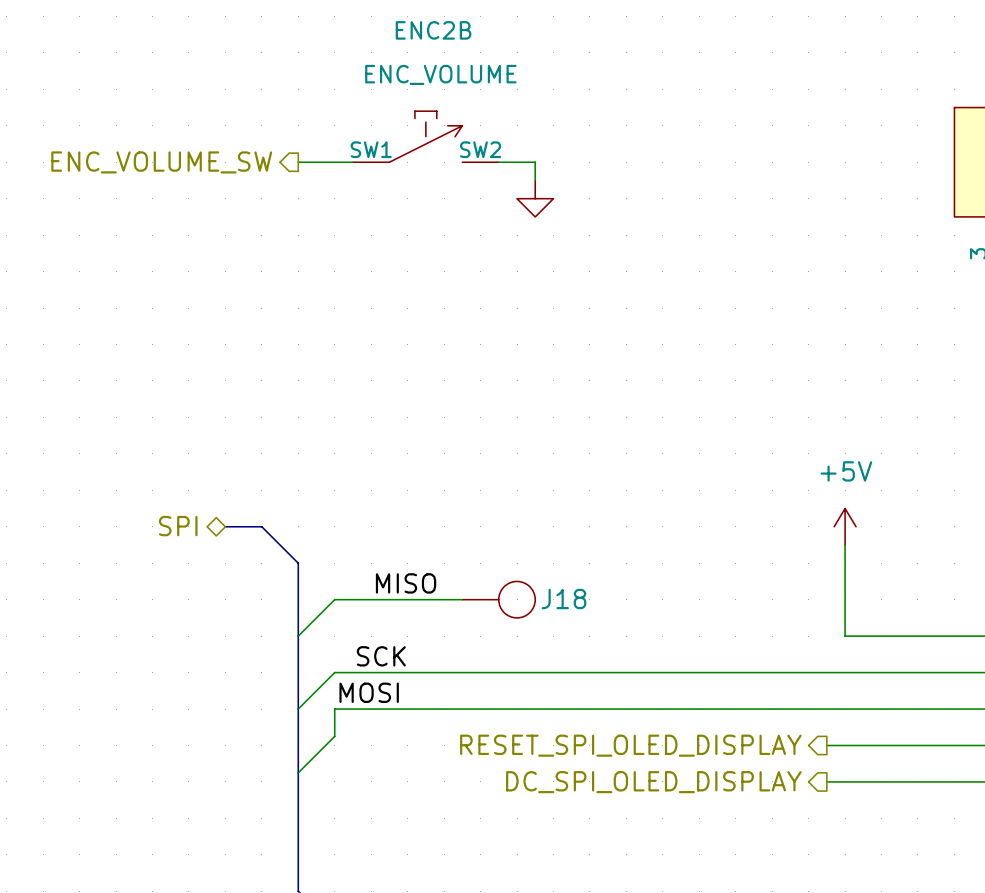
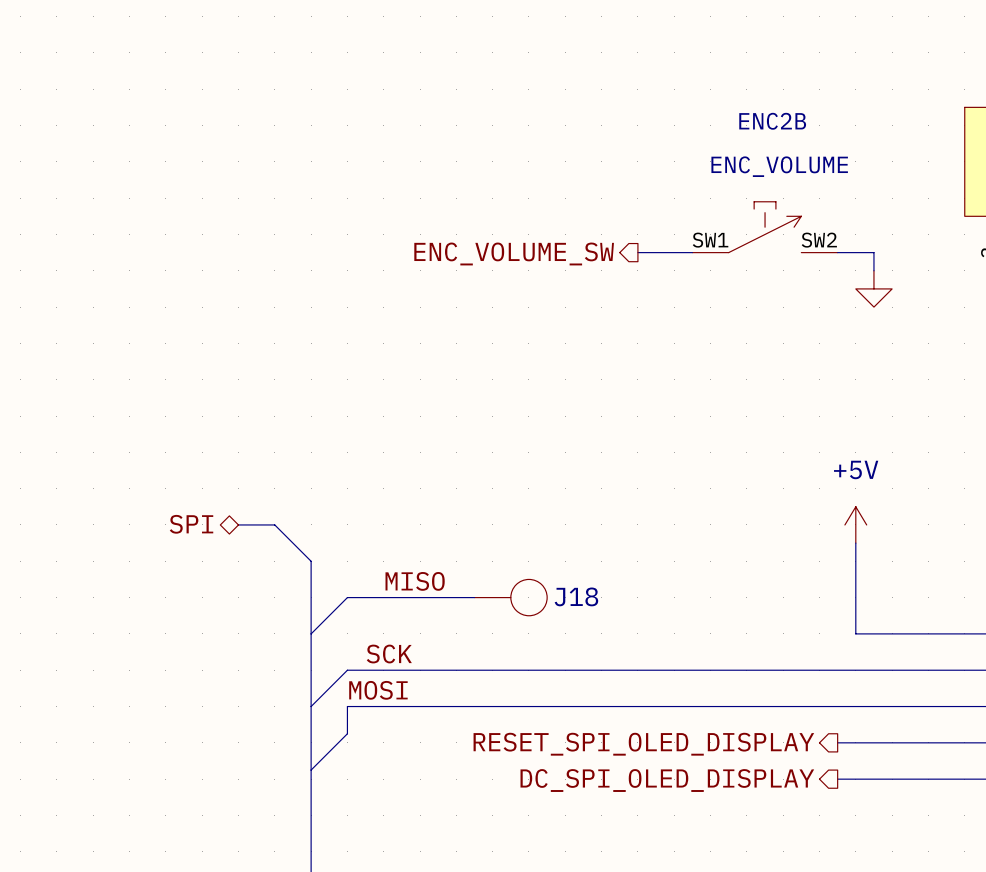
ENC2B position: (425, 136) -> (765, 227)
hierarchical label position: ENC_VOLUME_SW (161, 162) -> ENC_VOLUME_SW (514, 253)
wire: (298, 162) (352, 162) -> (637, 252) (692, 252)
wire: (498, 162) (535, 162) (535, 180) -> (837, 252) (873, 252) (873, 270)
power symbol position: (535, 198) -> (873, 288)

